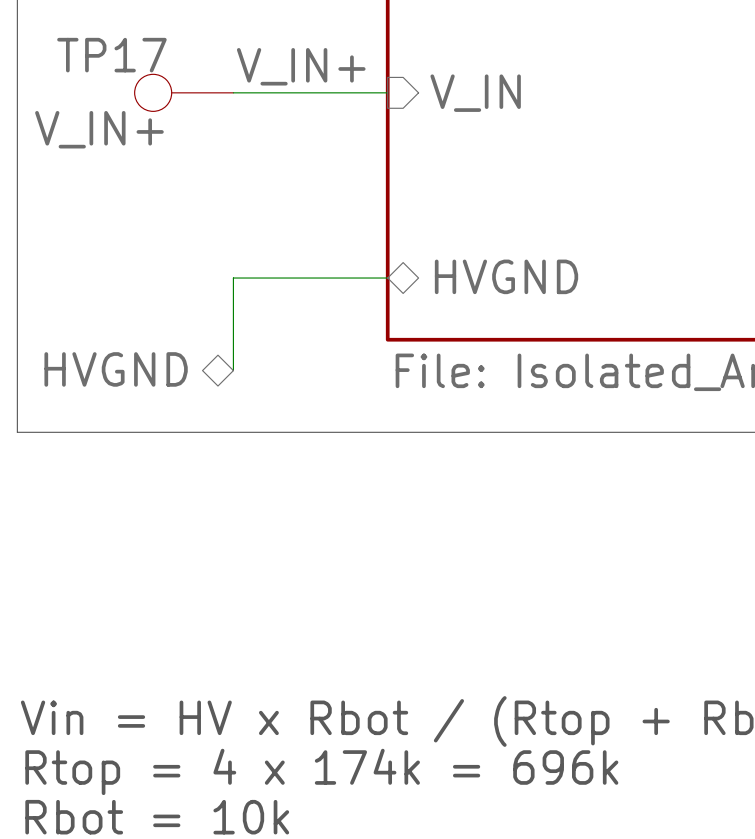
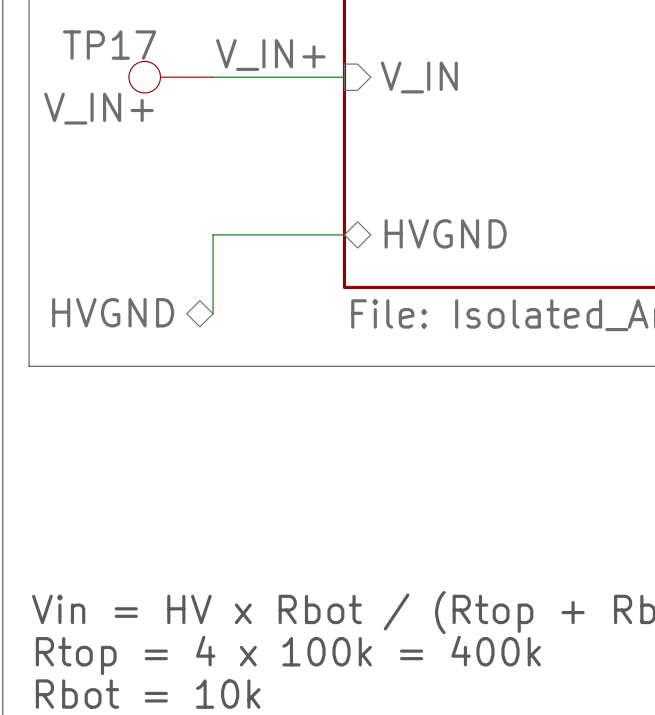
text: Rtop = 4 x 174k = 696k (321, 771) -> Rtop = 4 x 100k = 400k (288, 655)

